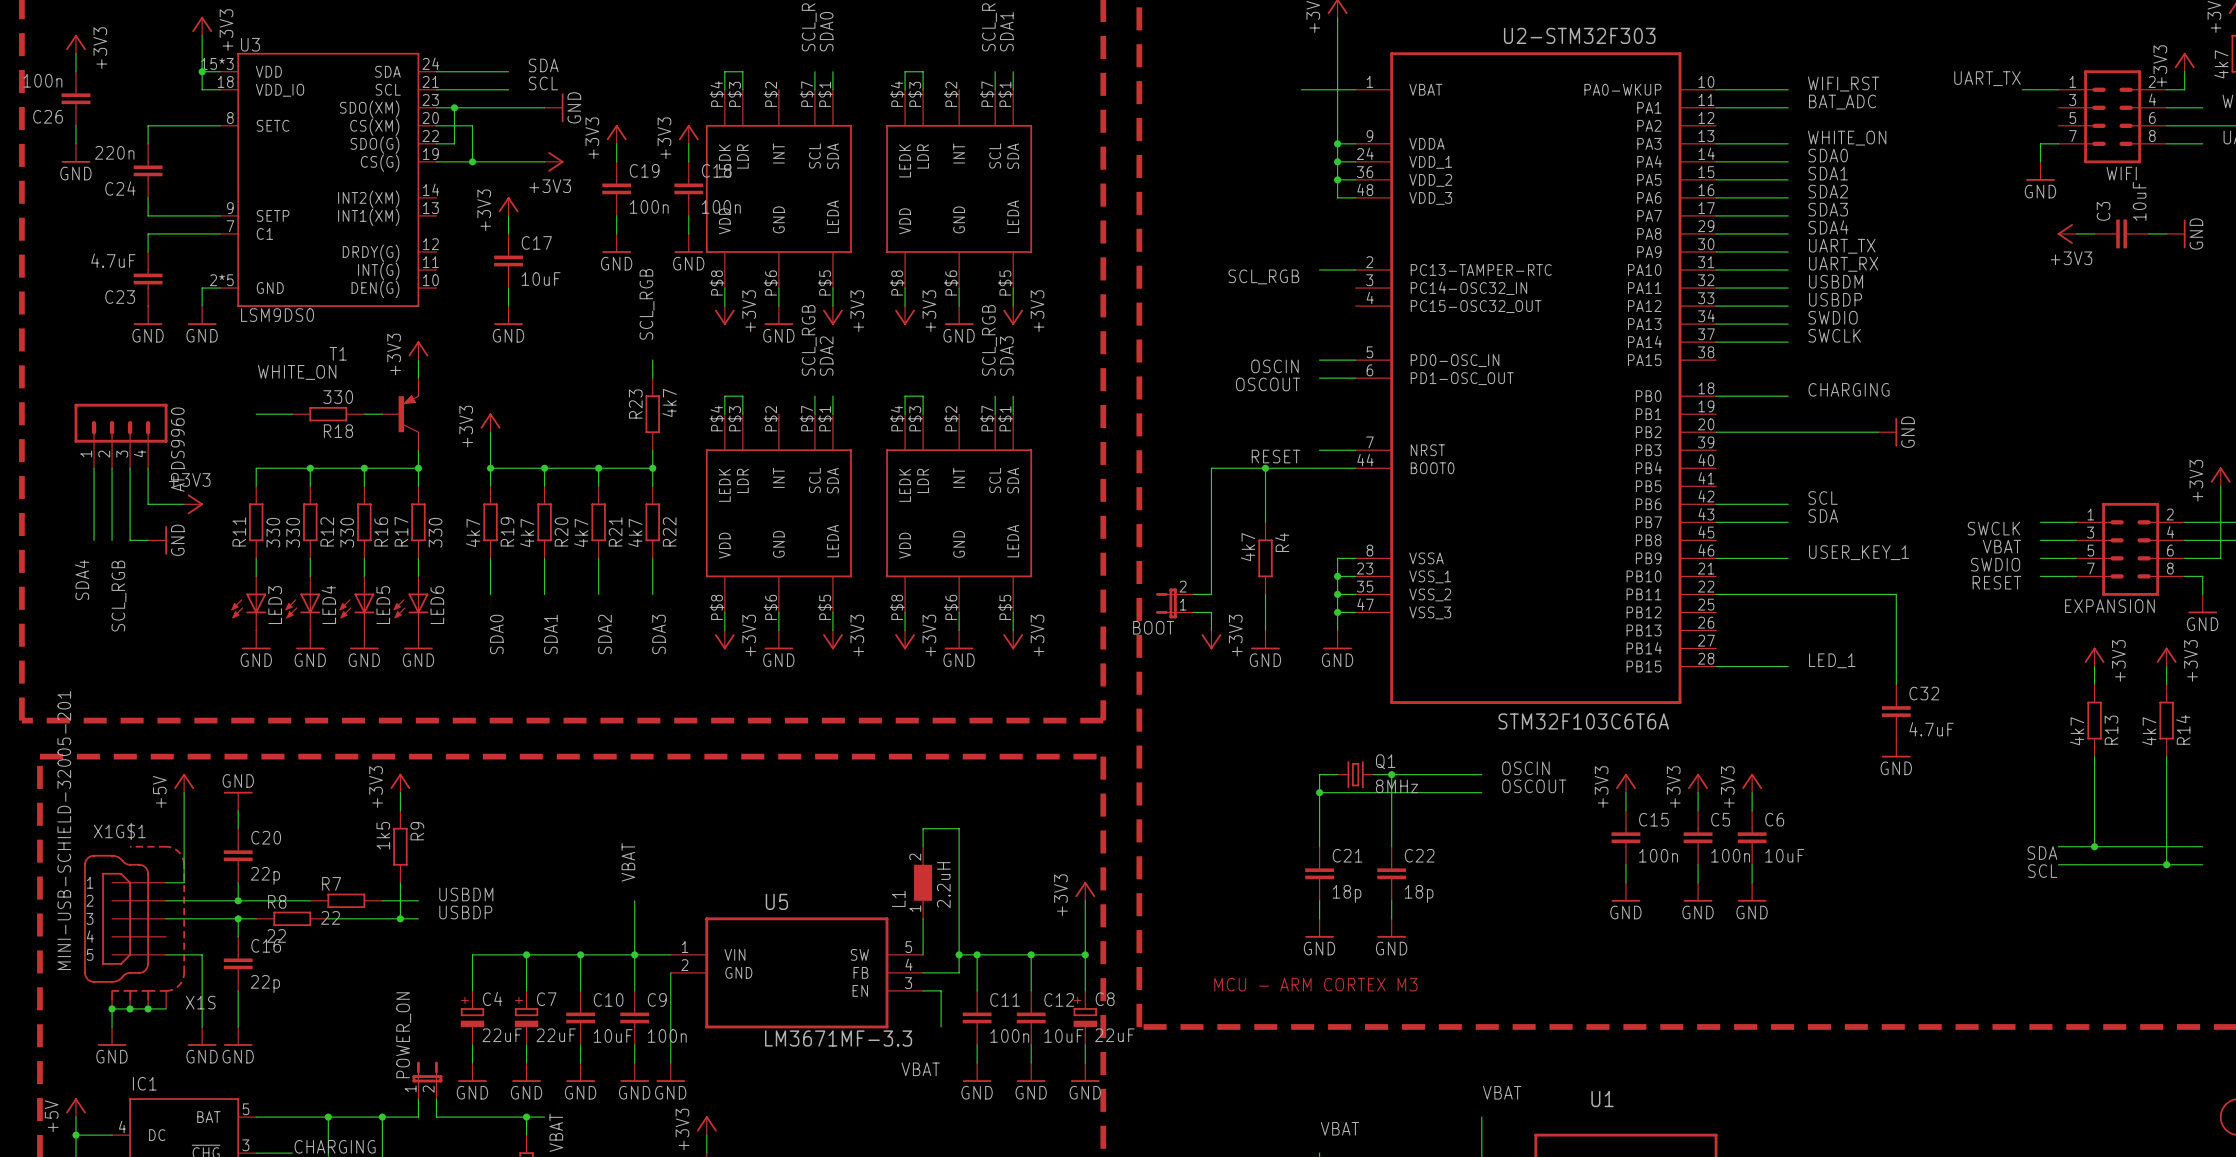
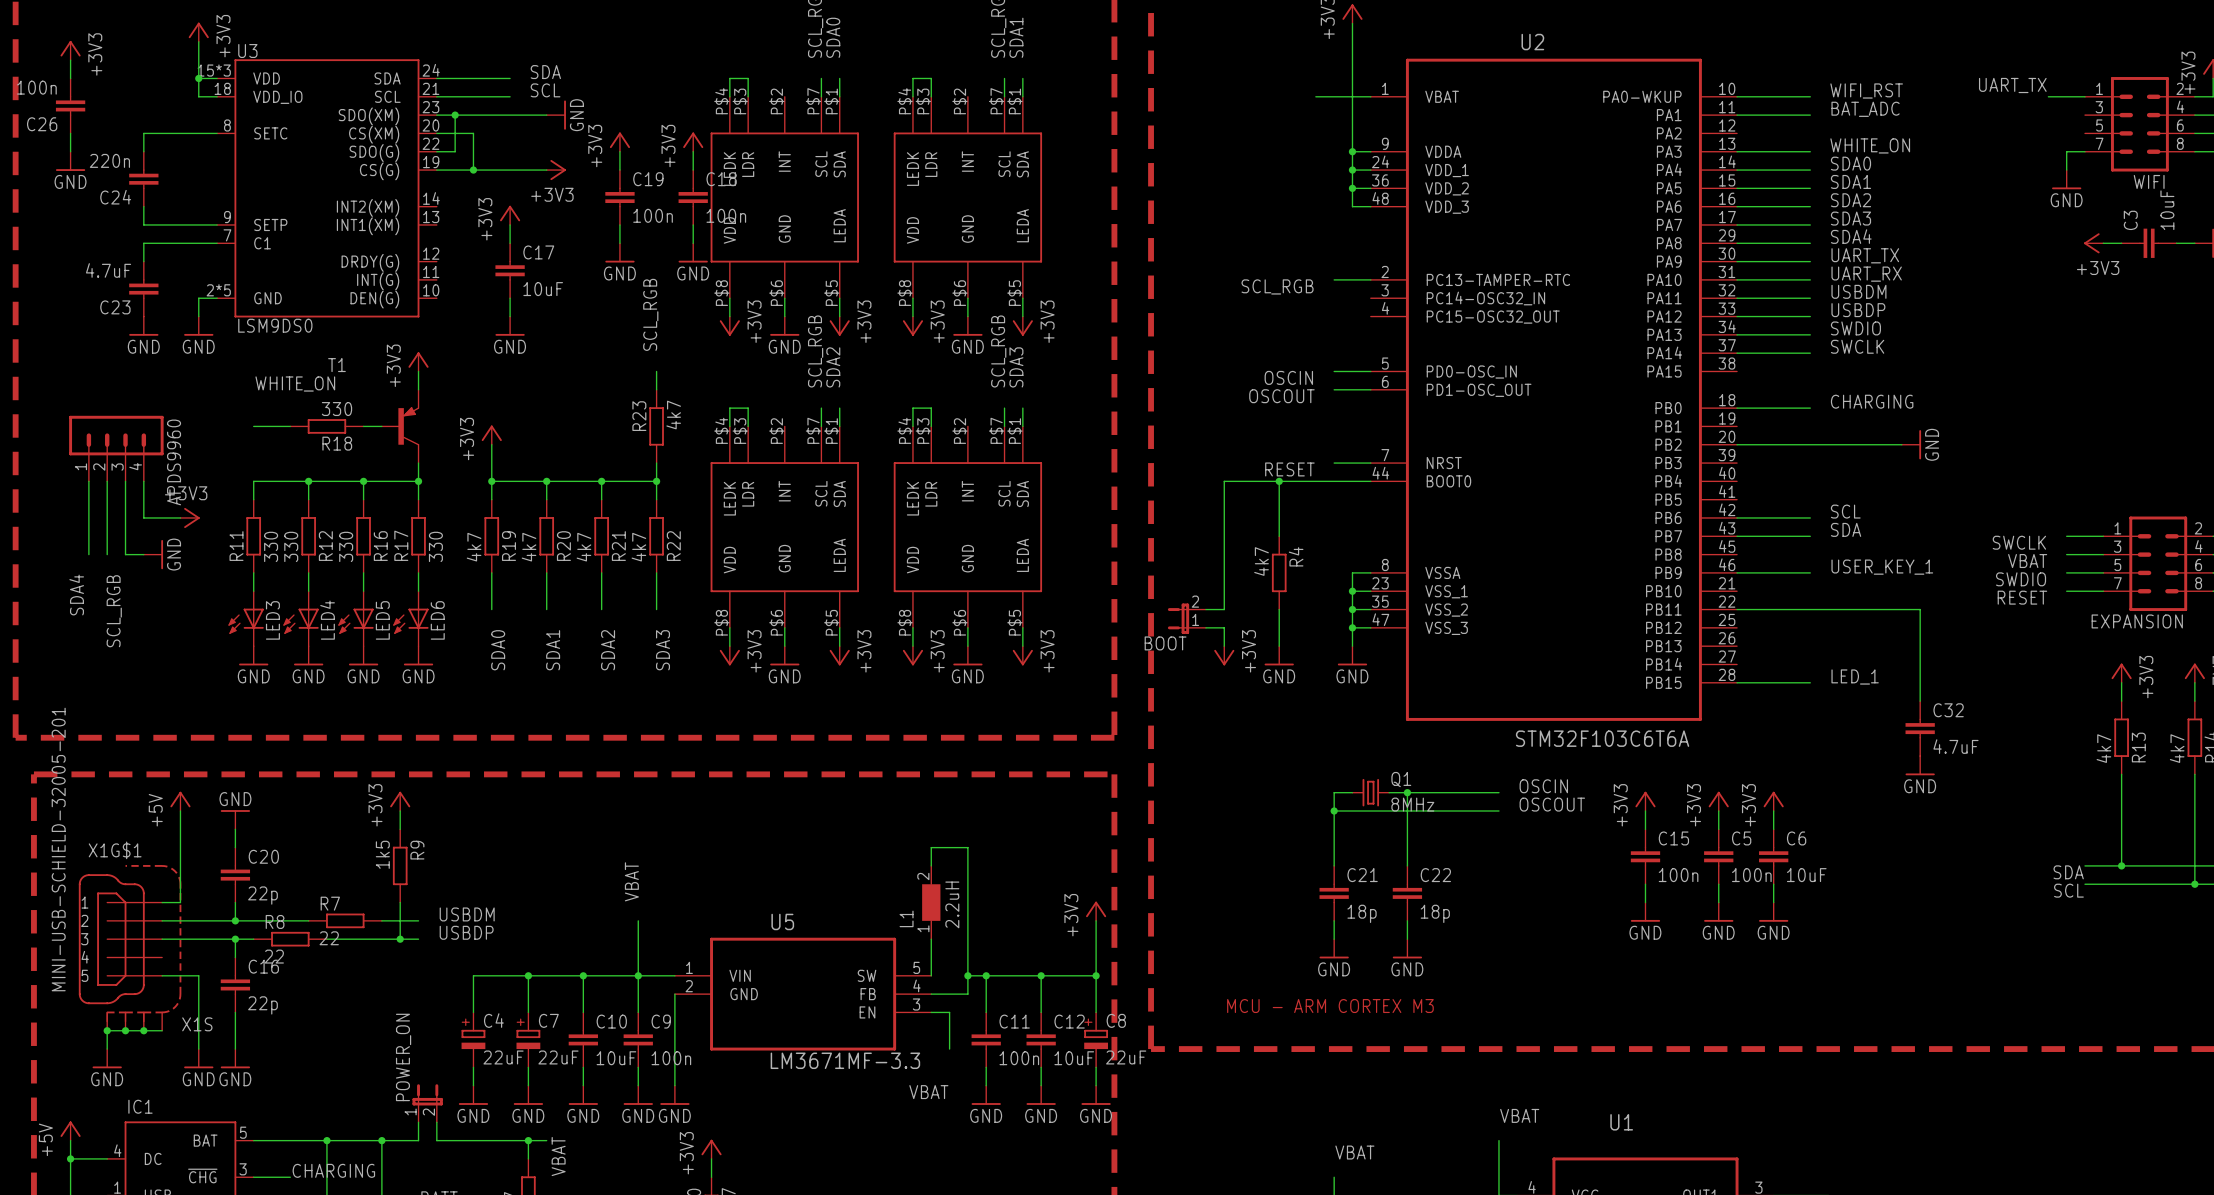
U2-STM32F303 name: U2-STM32F303 (1579, 35) -> U2 (1532, 42)

